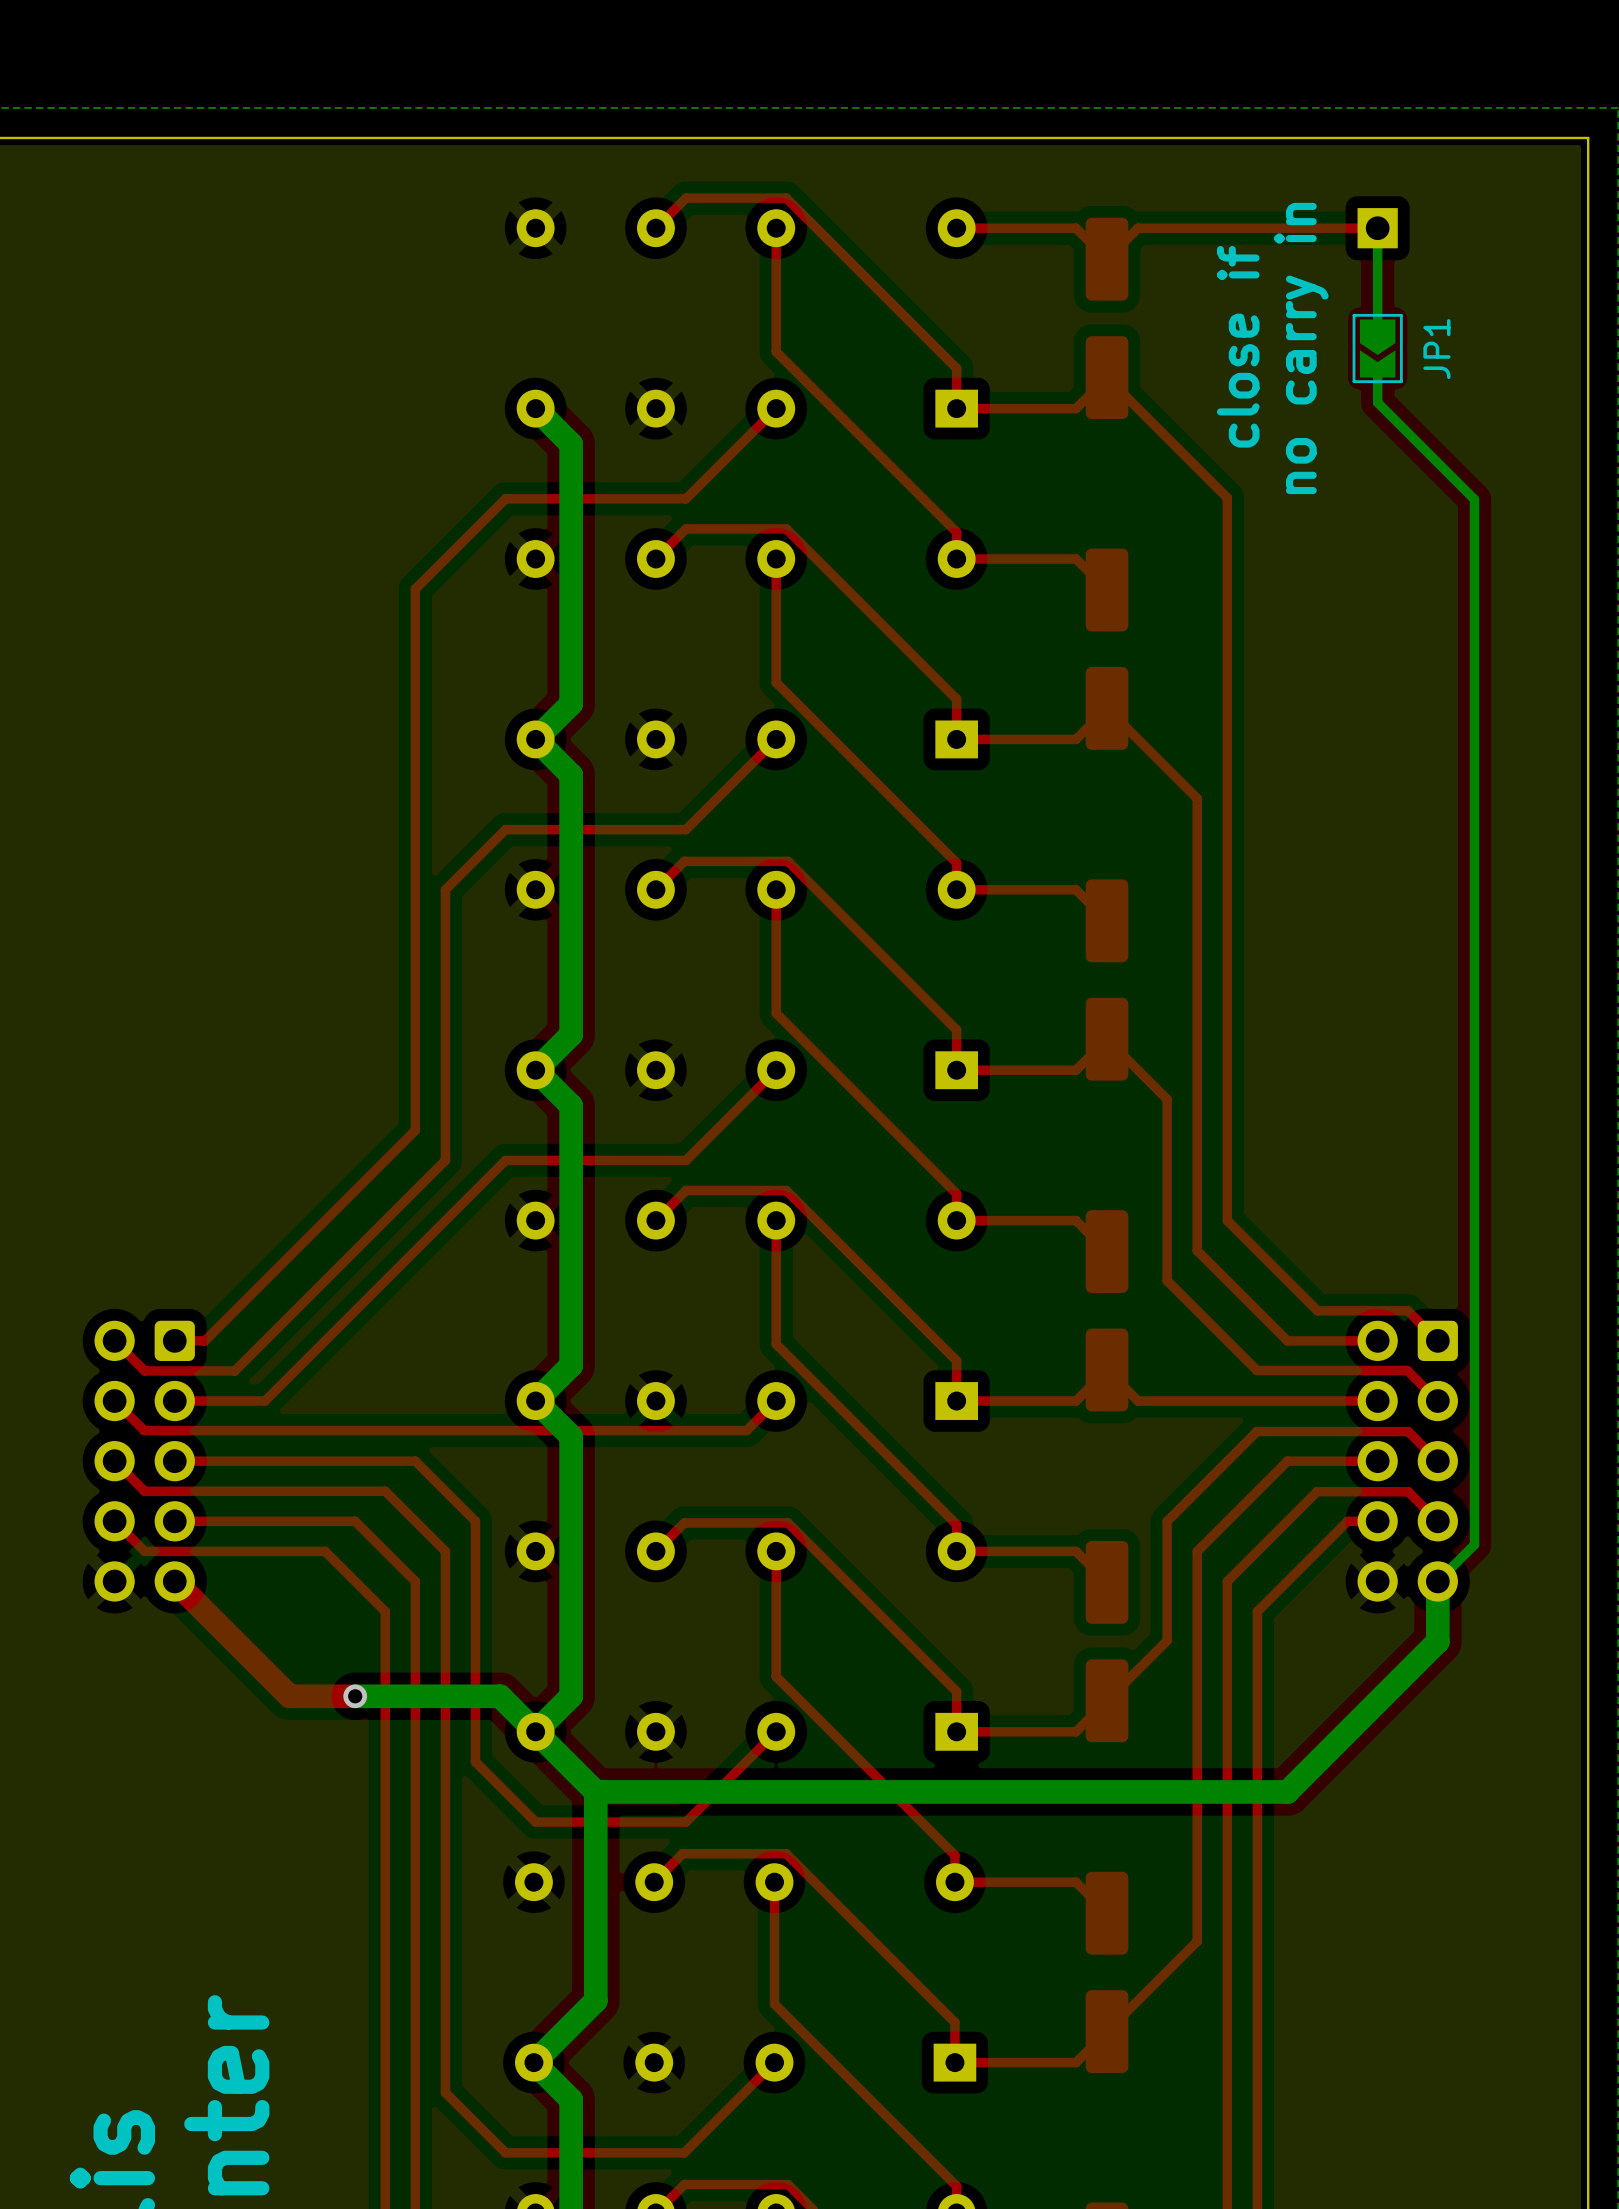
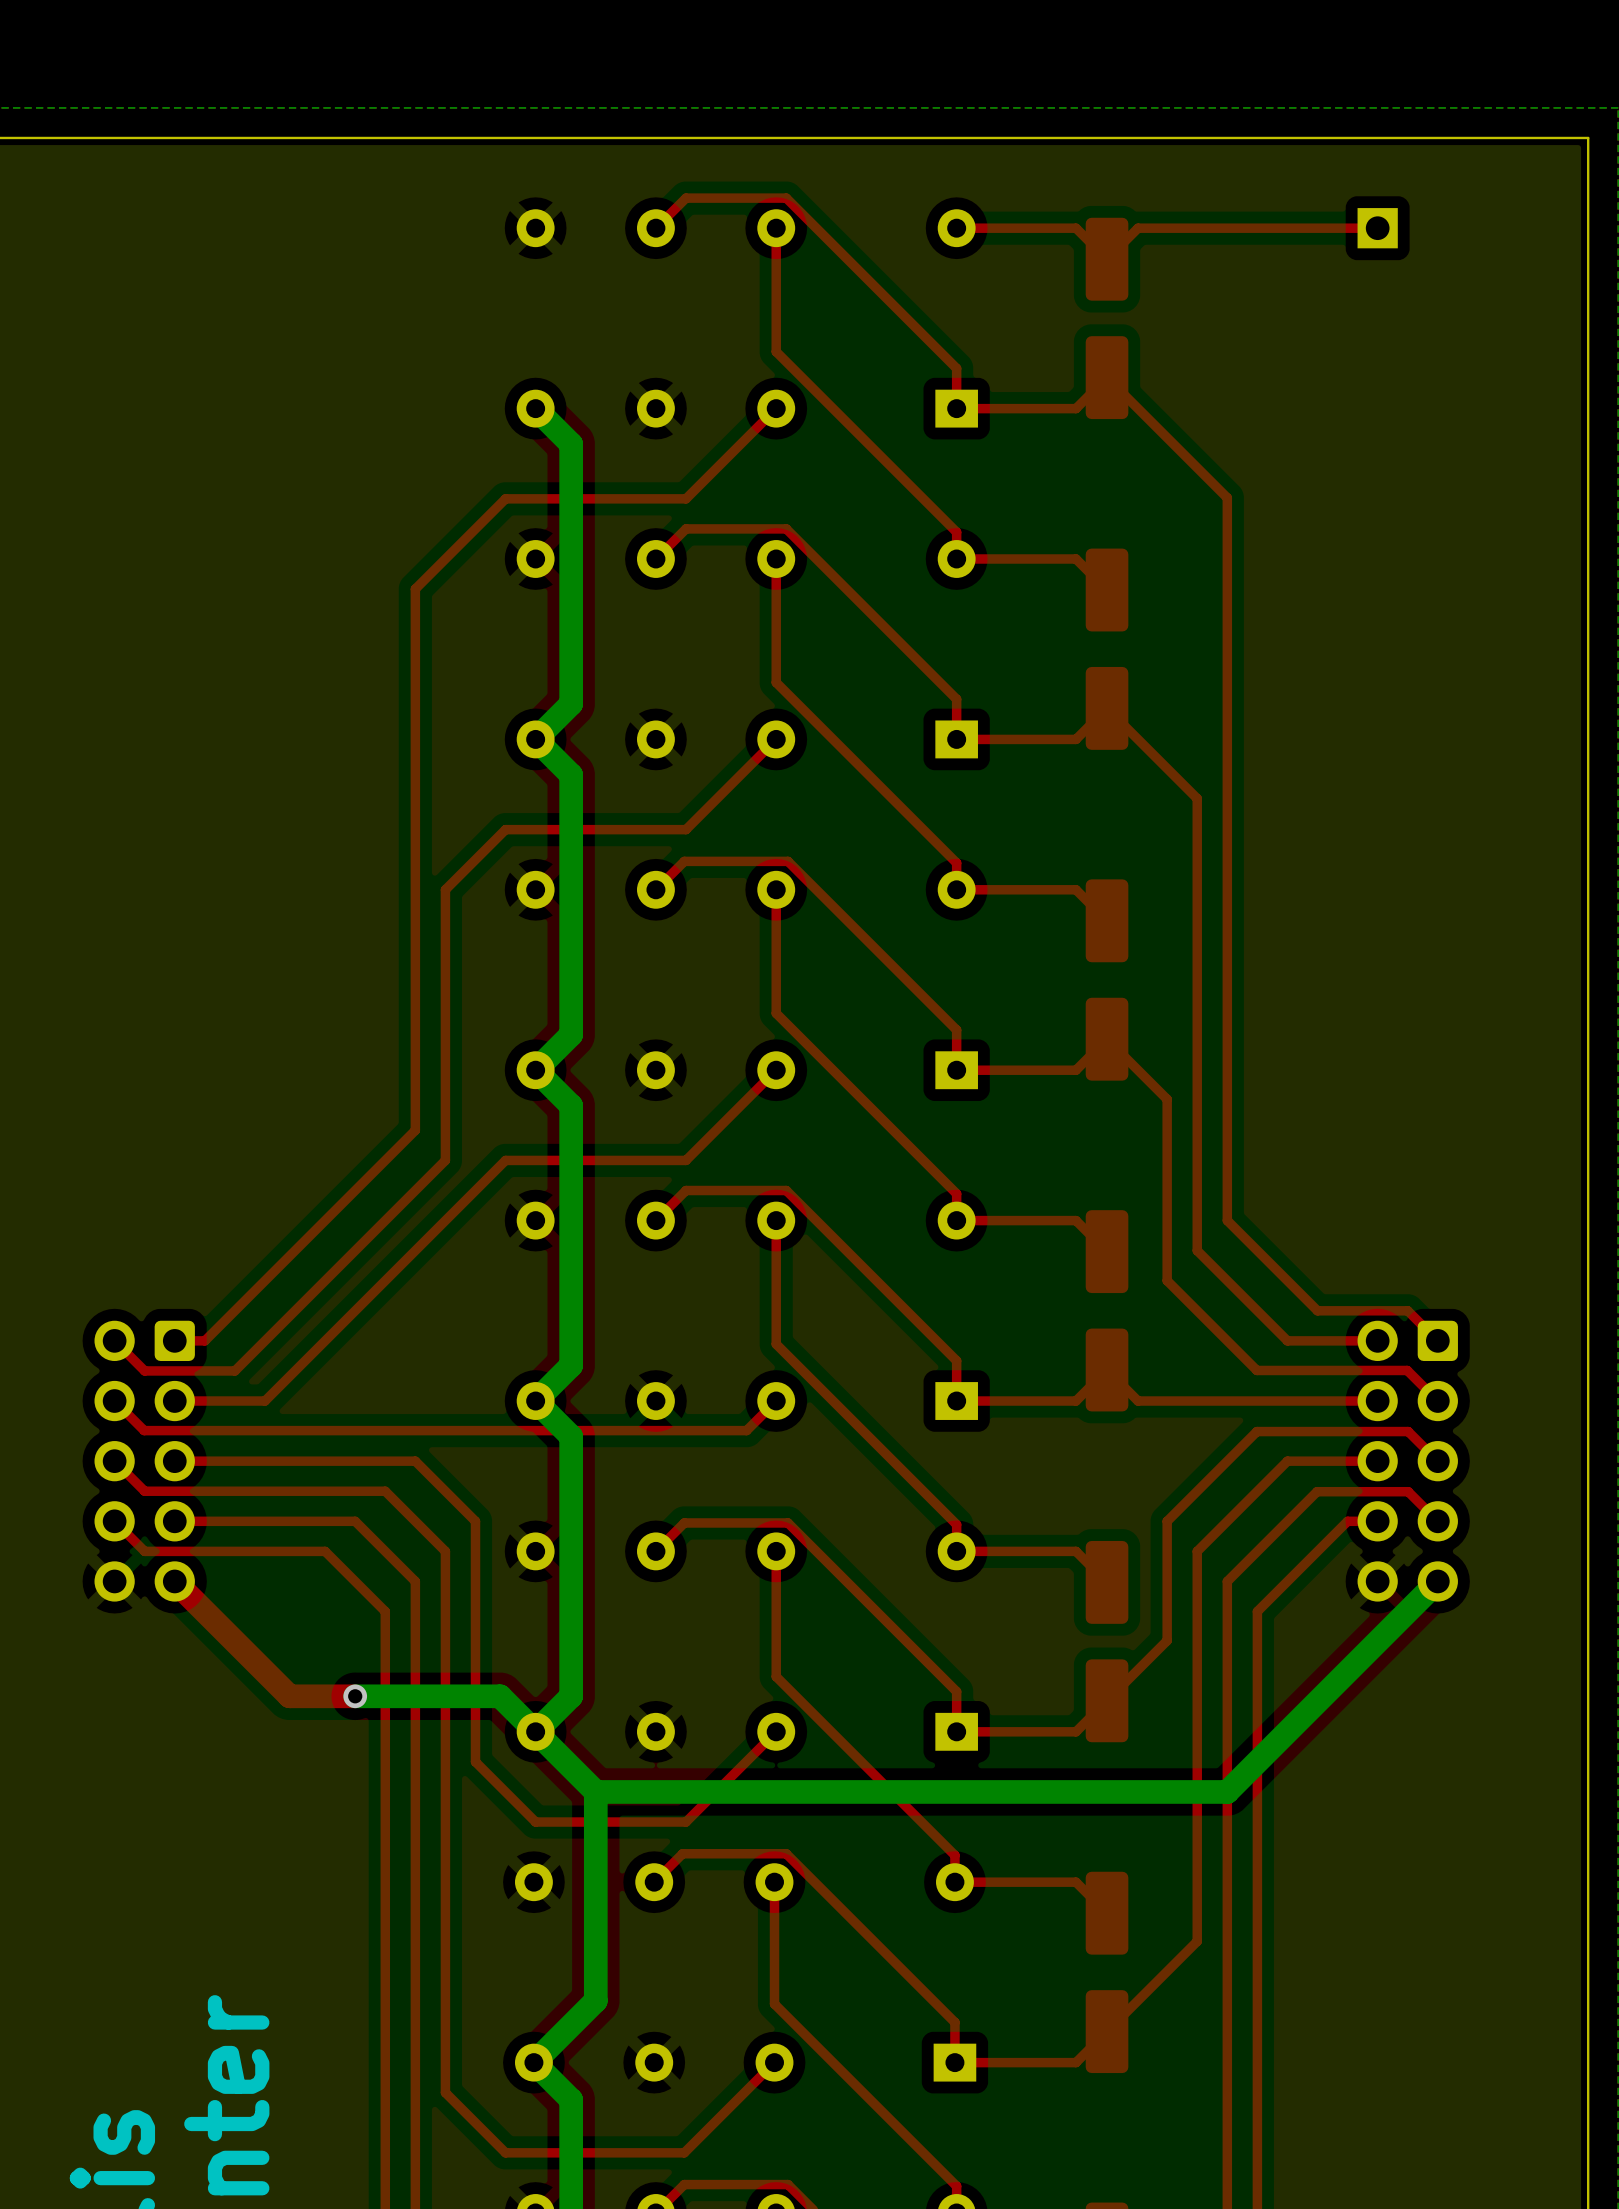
bottom track: (1377, 228) (1377, 331) -> none
text: close if (1238, 346) -> none
text: no carry in (1301, 348) -> none
JP1: (1377, 348) -> none
bottom track: (1377, 371) (1377, 402) (1474, 499) (1474, 1544) (1437, 1581) (1437, 1641) (1287, 1791) (1227, 1791) -> (1437, 1581) (1227, 1791)

